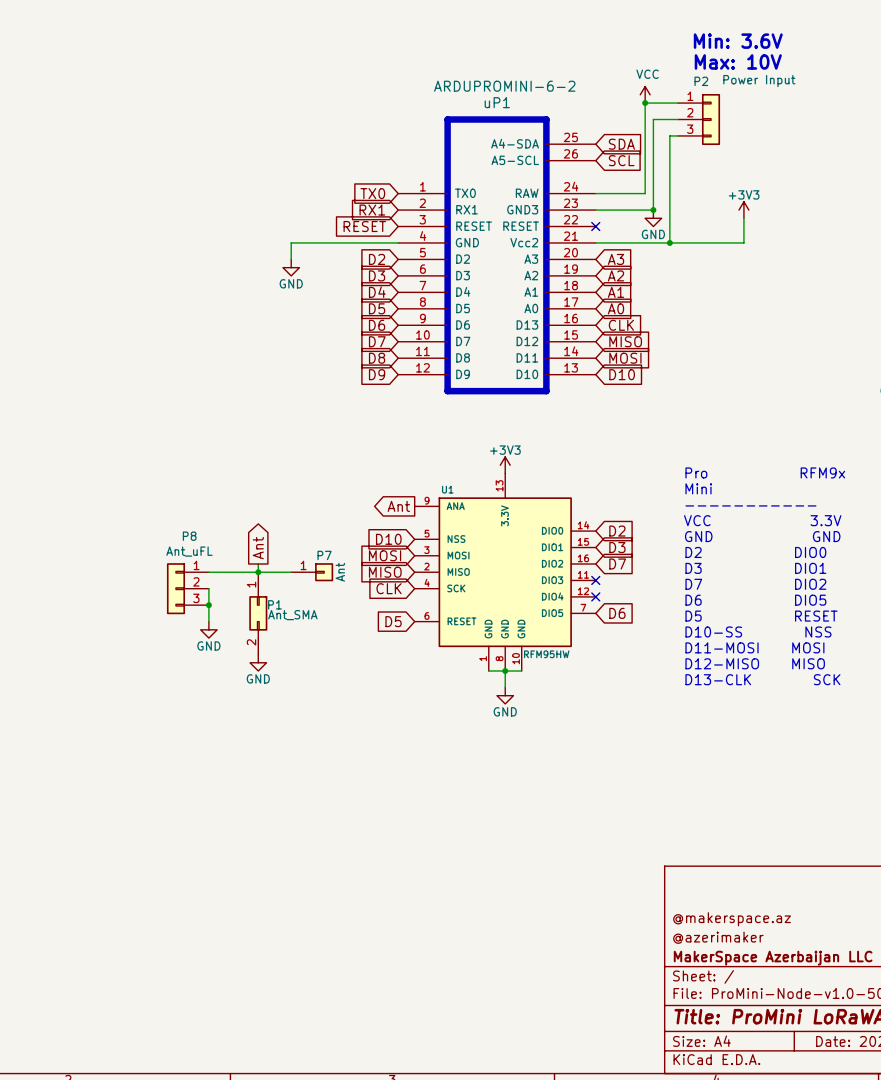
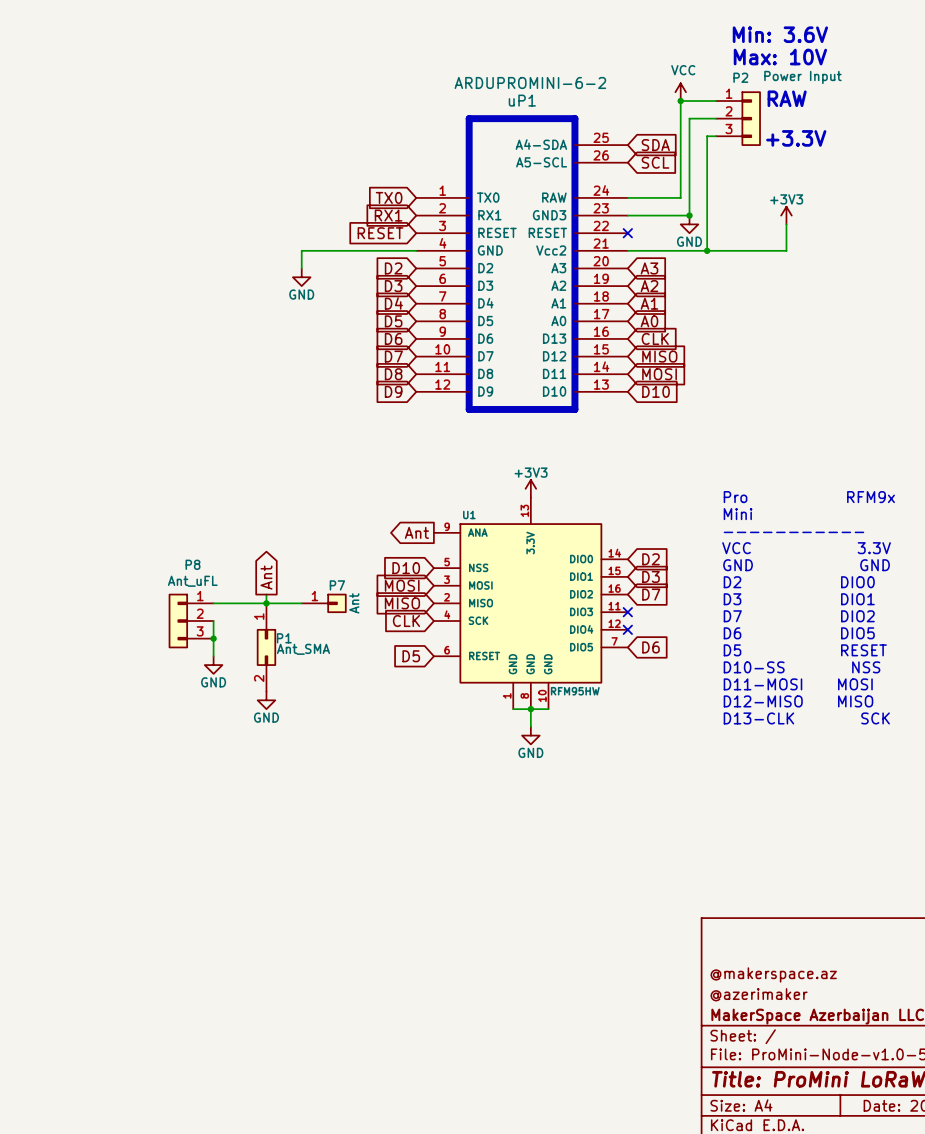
text: none -> RAW (787, 98)
text: none -> +3.3V (796, 138)

